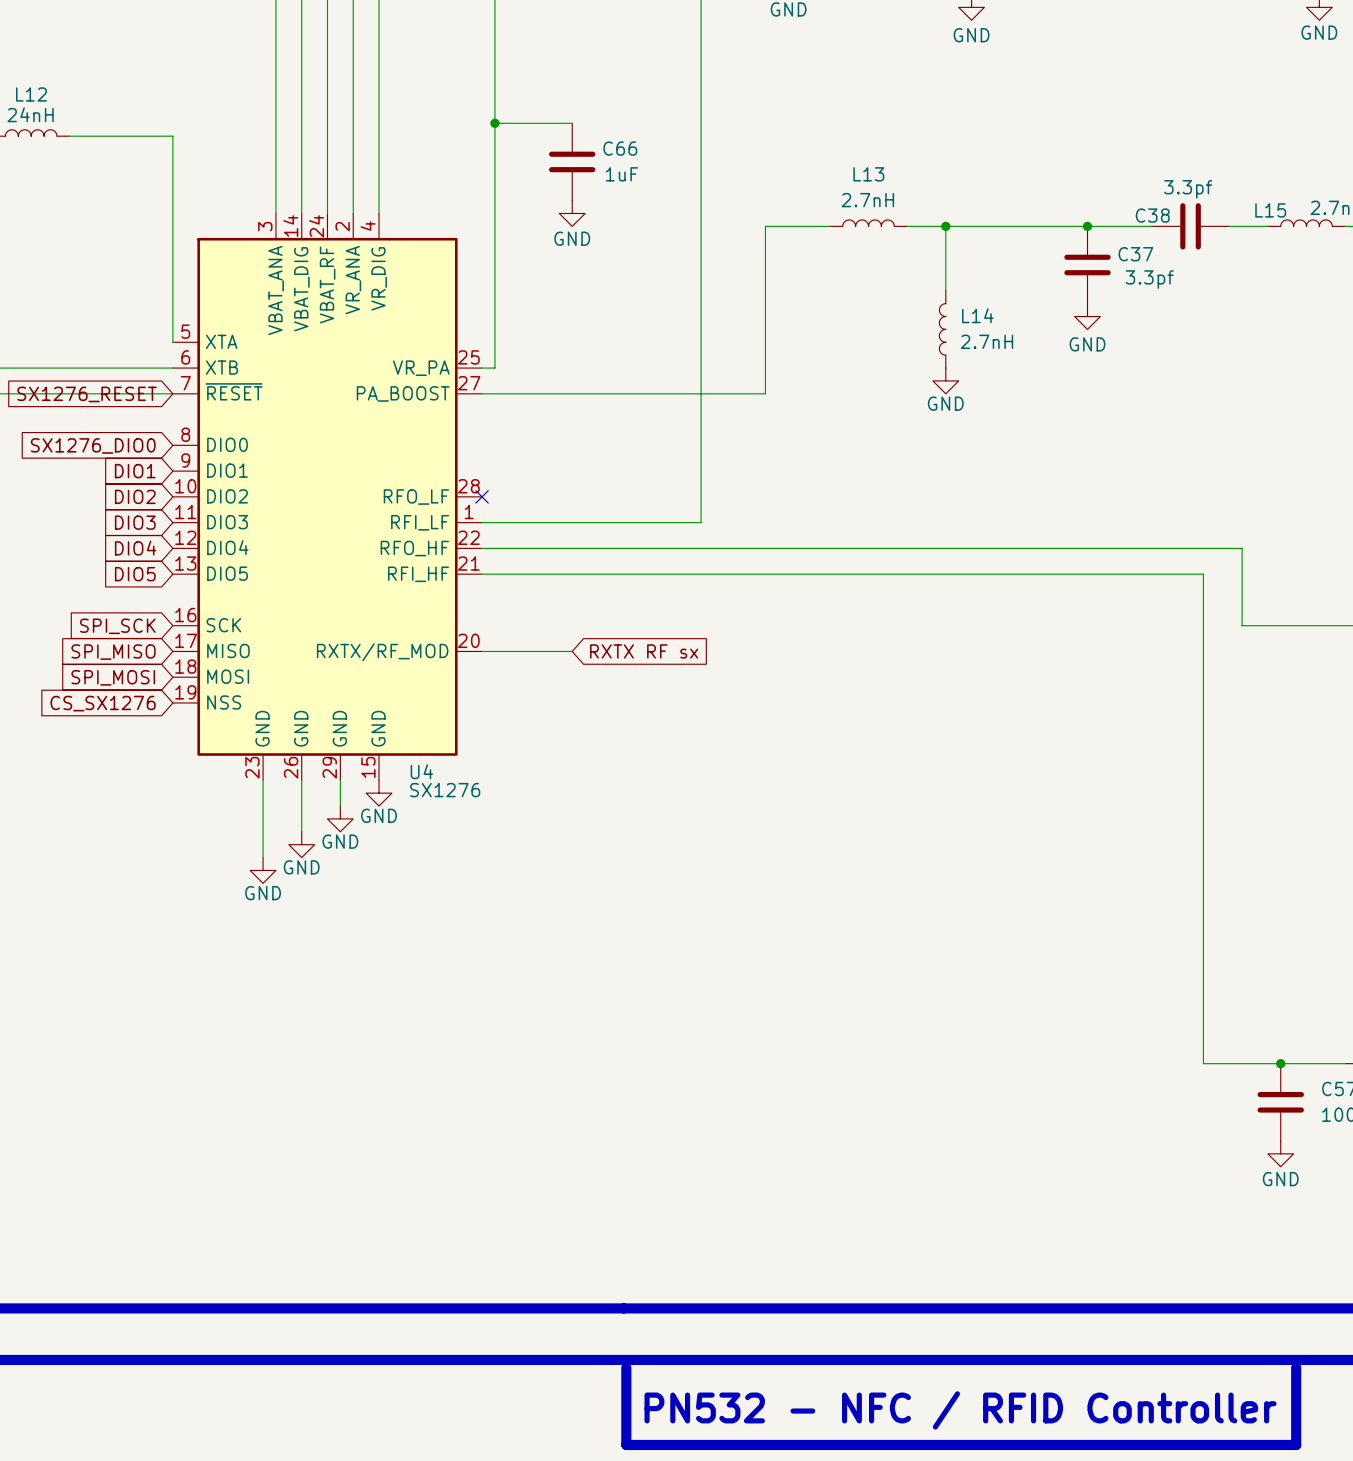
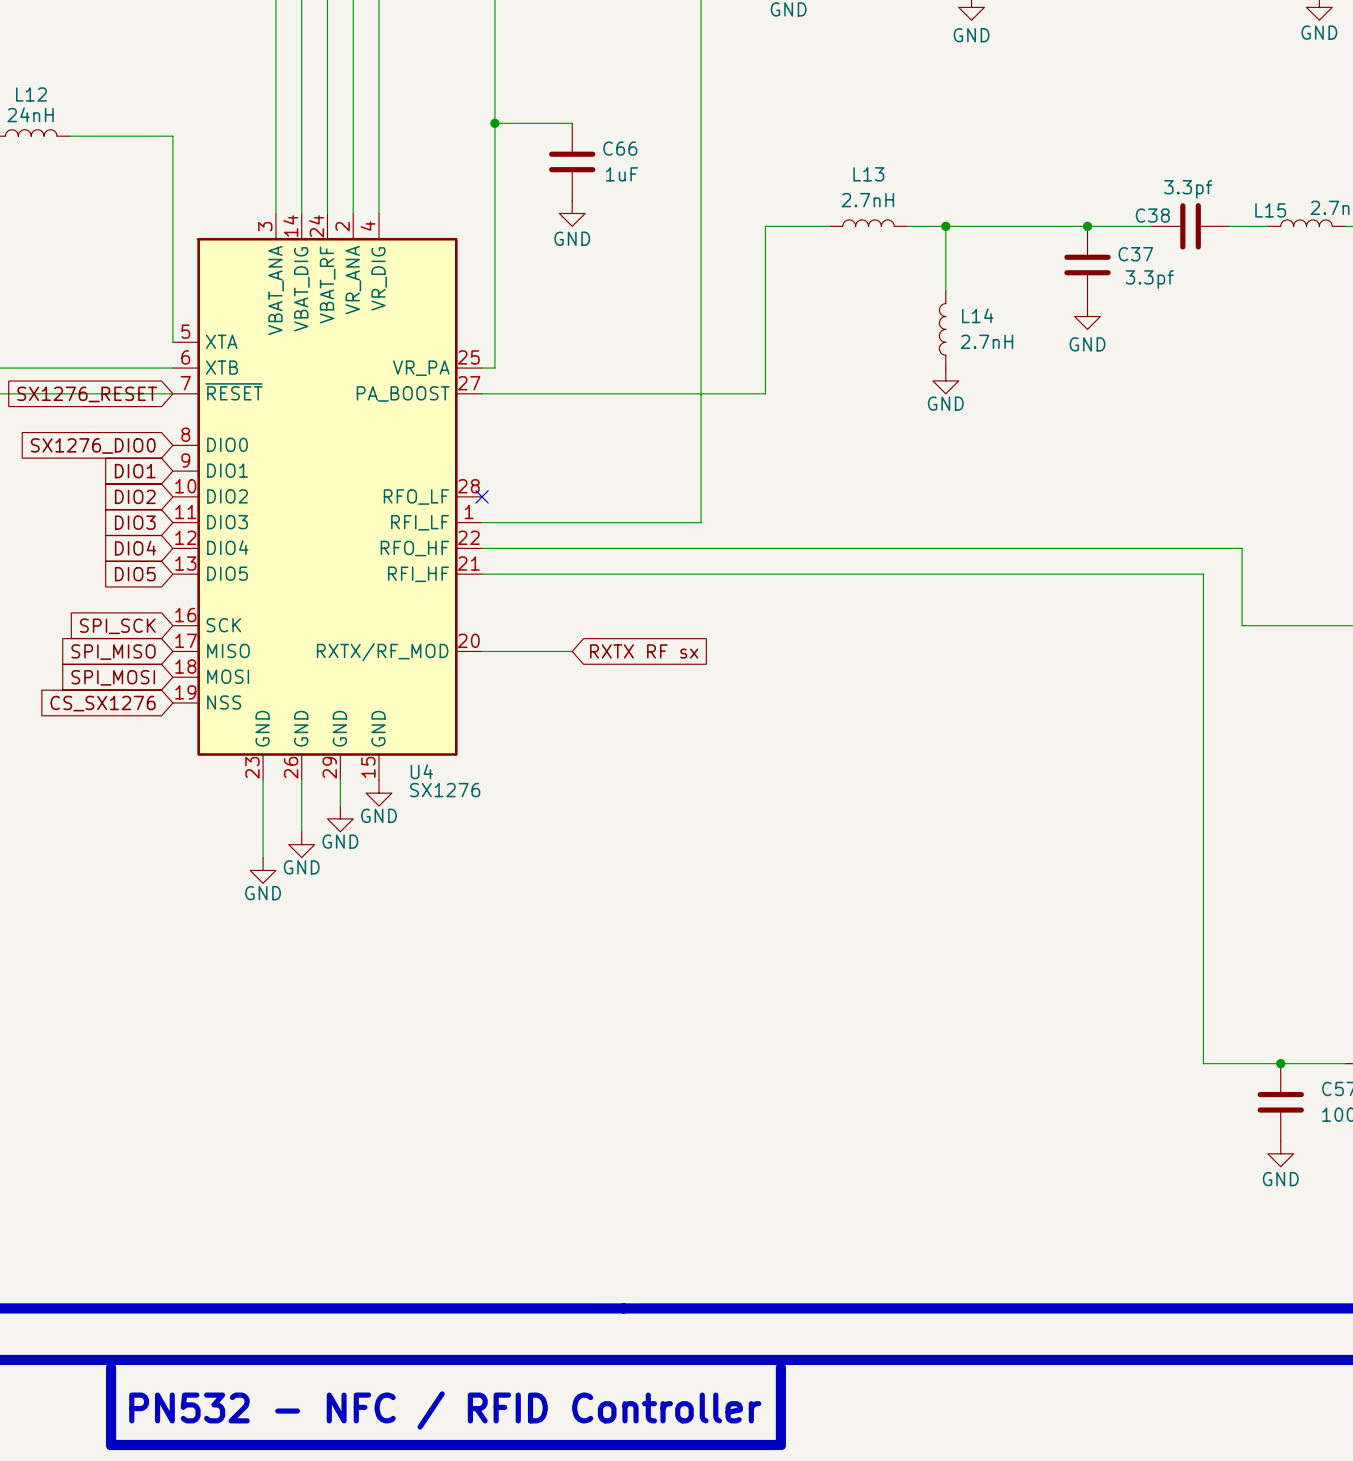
line: (626, 1367) (626, 1444) -> (111, 1367) (111, 1444) (626, 1444)
line: (1296, 1367) (1296, 1444) (780, 1444) -> (780, 1367) (780, 1444)
text: none -> PN532 - NFC / RFID Controller (445, 1410)
text: PN532 - NFC / RFID Controller (960, 1410) -> none

